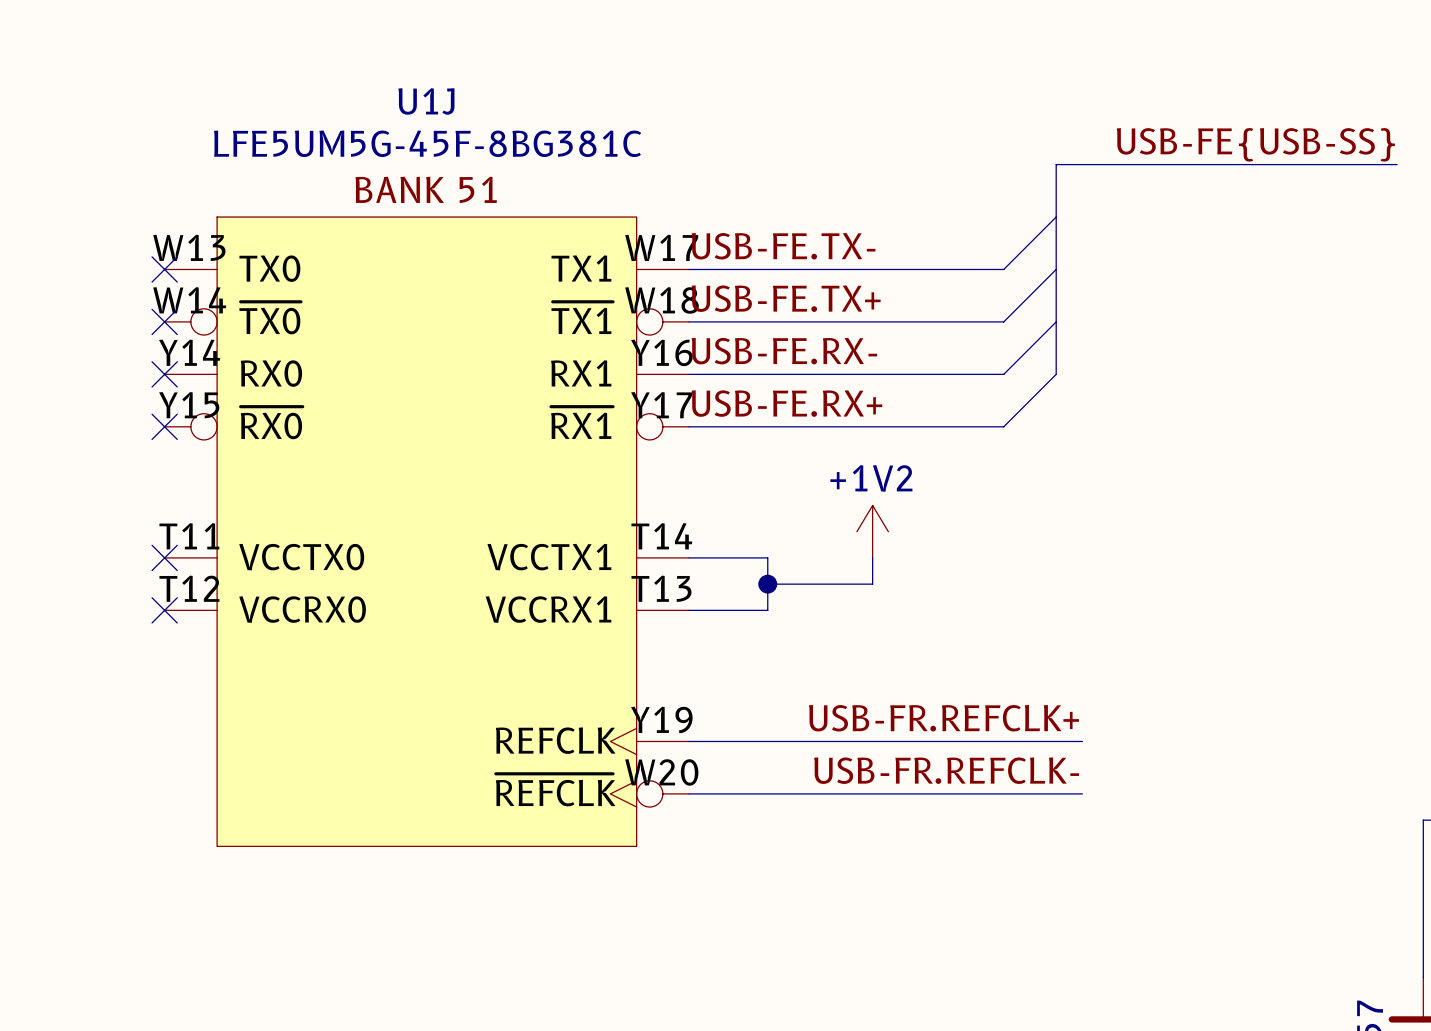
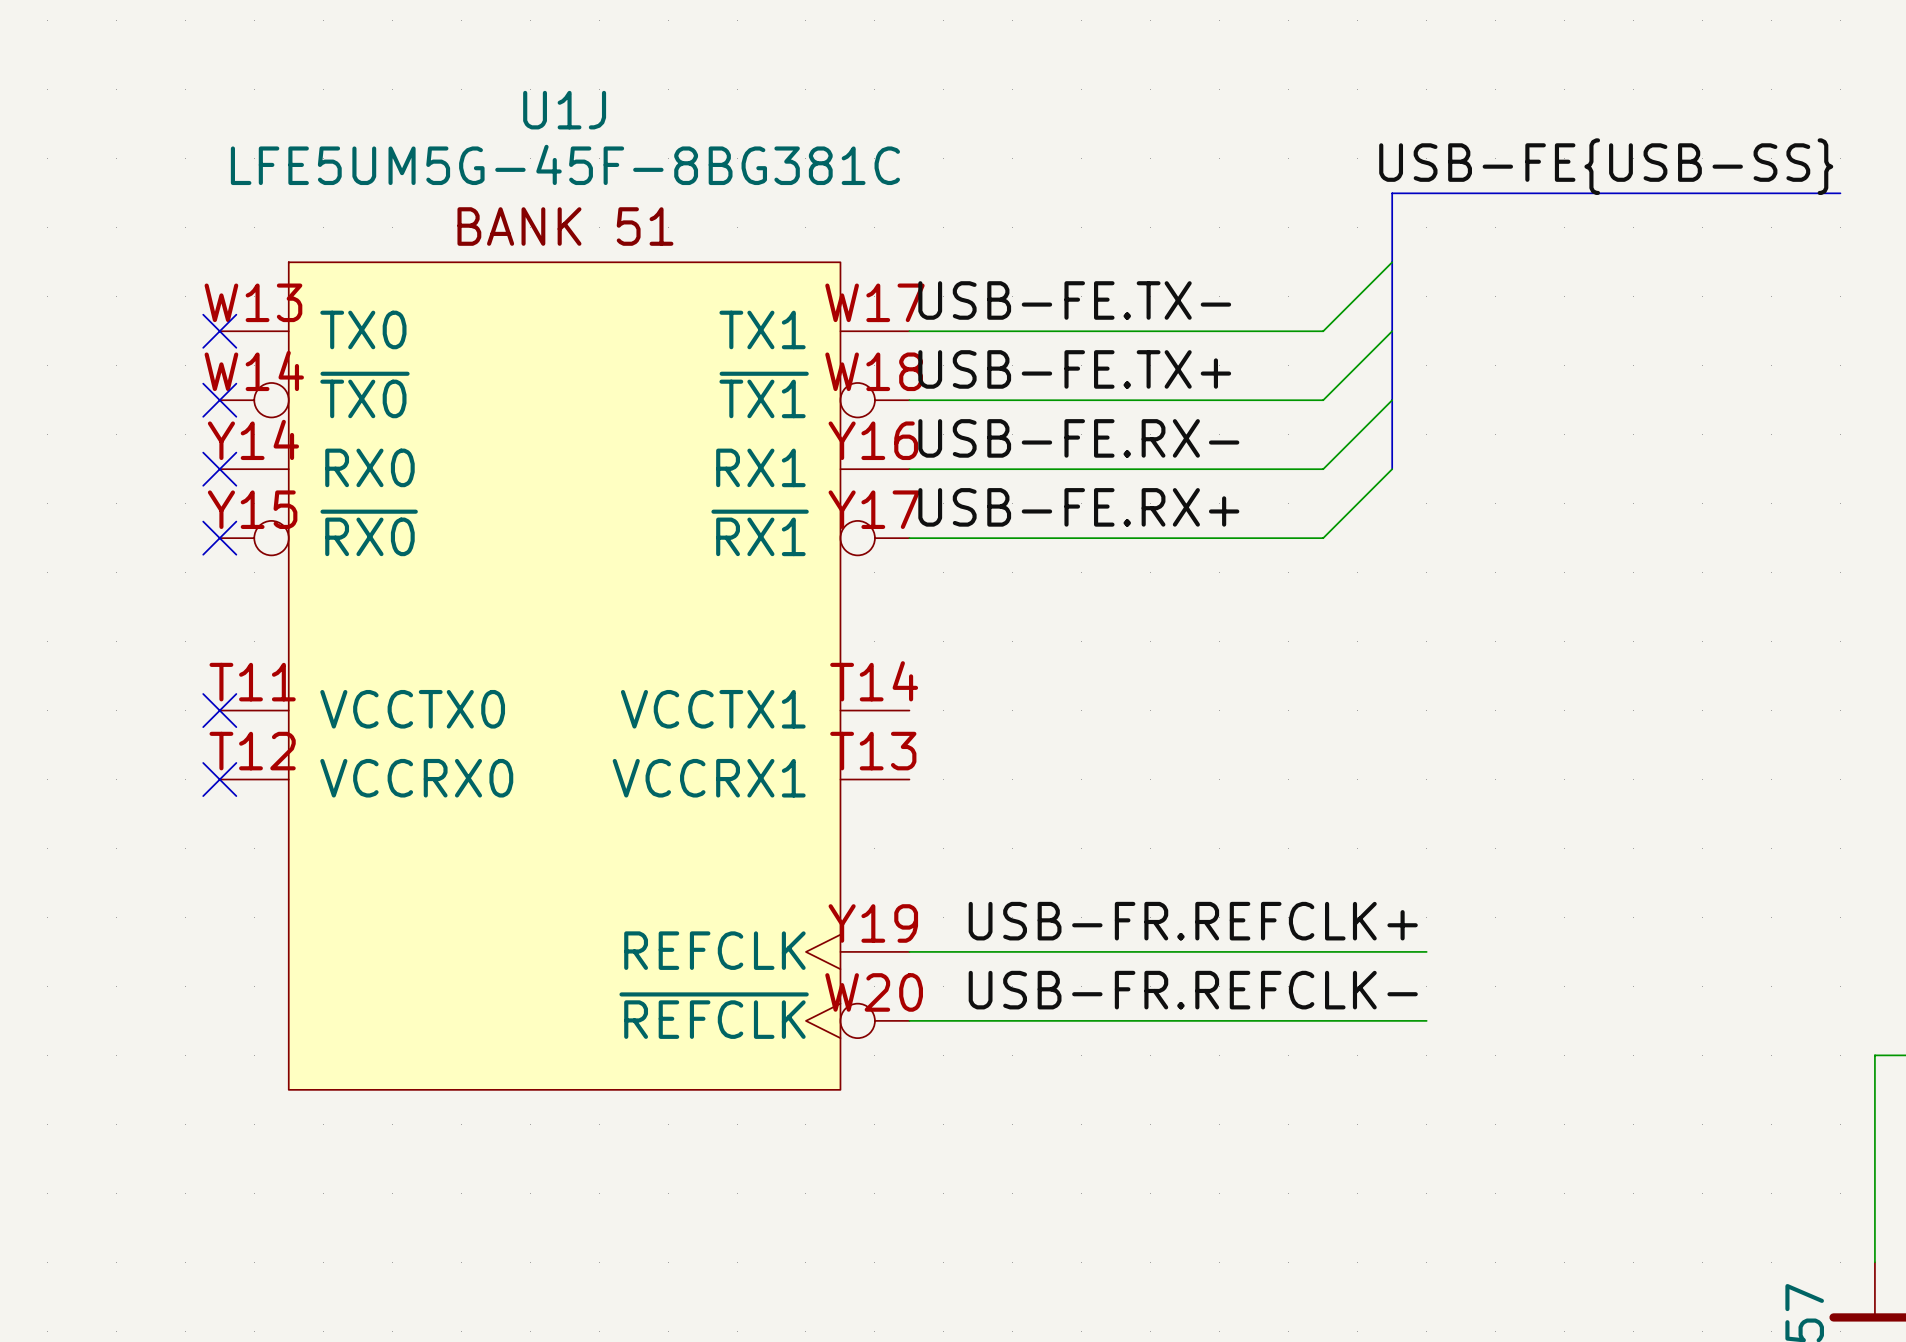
power symbol: +1V2 (872, 531) -> none
wire: (689, 557) (767, 557) (767, 610) (689, 610) -> none
wire: (872, 557) (872, 584) (767, 584) -> none
junction: (767, 584) -> none

